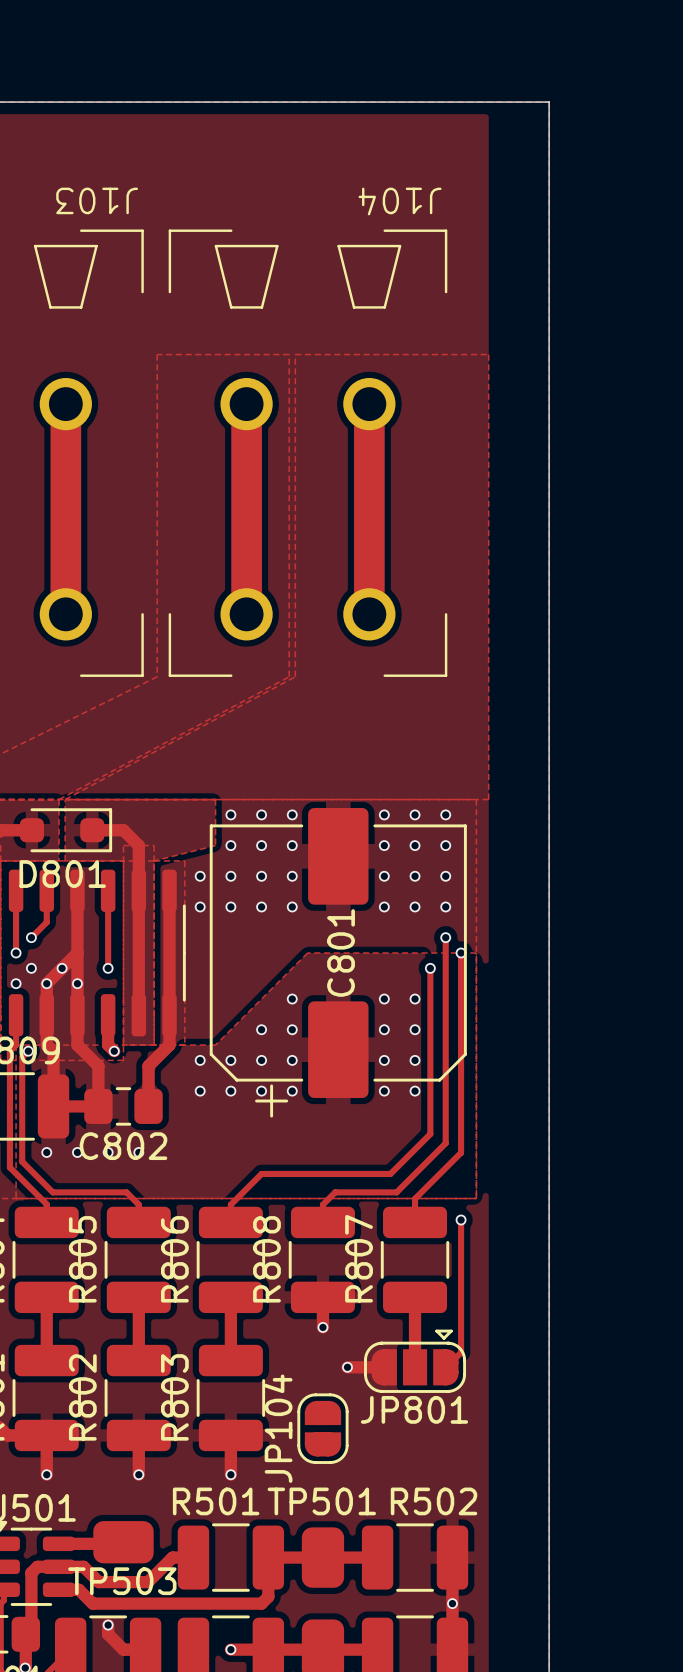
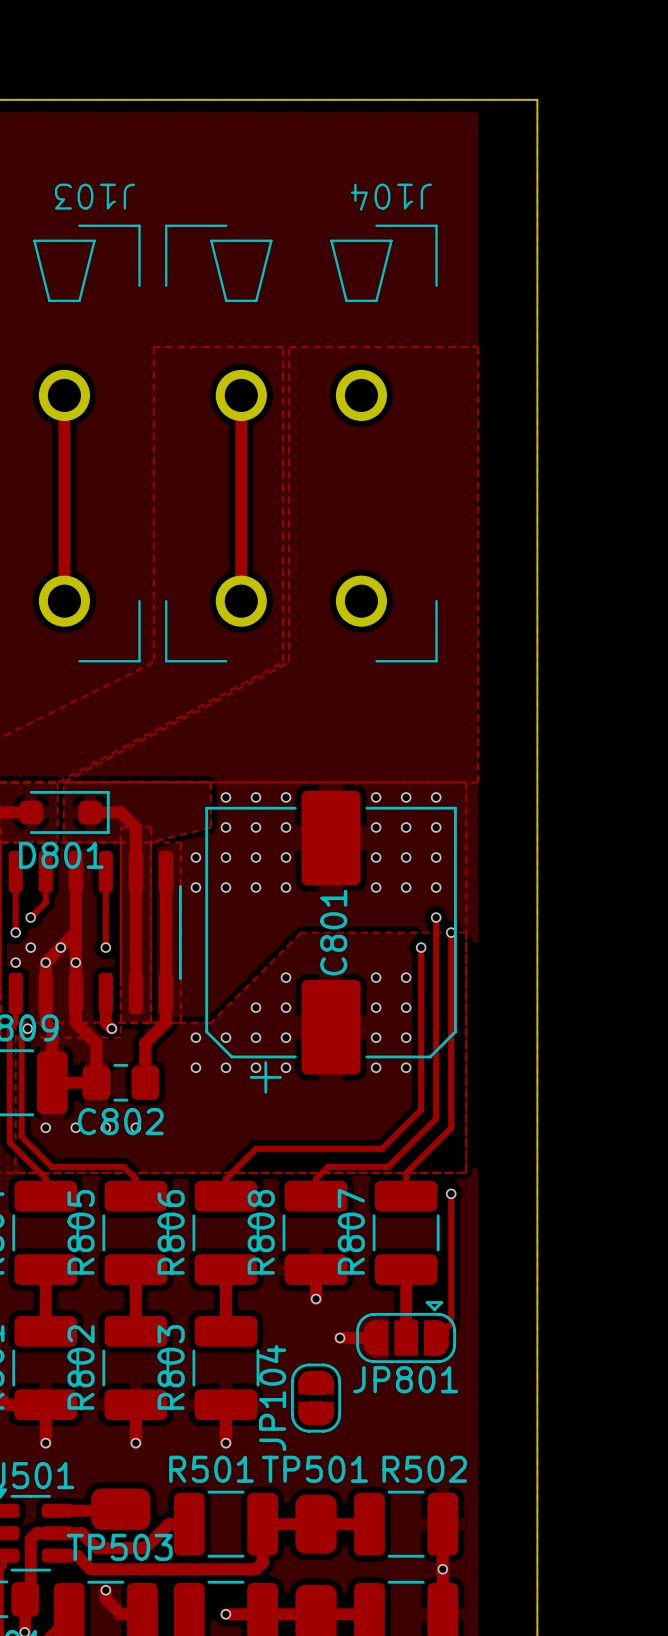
track width: thick (65, 404) (65, 614) -> thin (64, 395) (64, 601)
track width: thick (246, 404) (246, 614) -> thin (241, 395) (241, 601)
track: (369, 404) (369, 614) -> none

